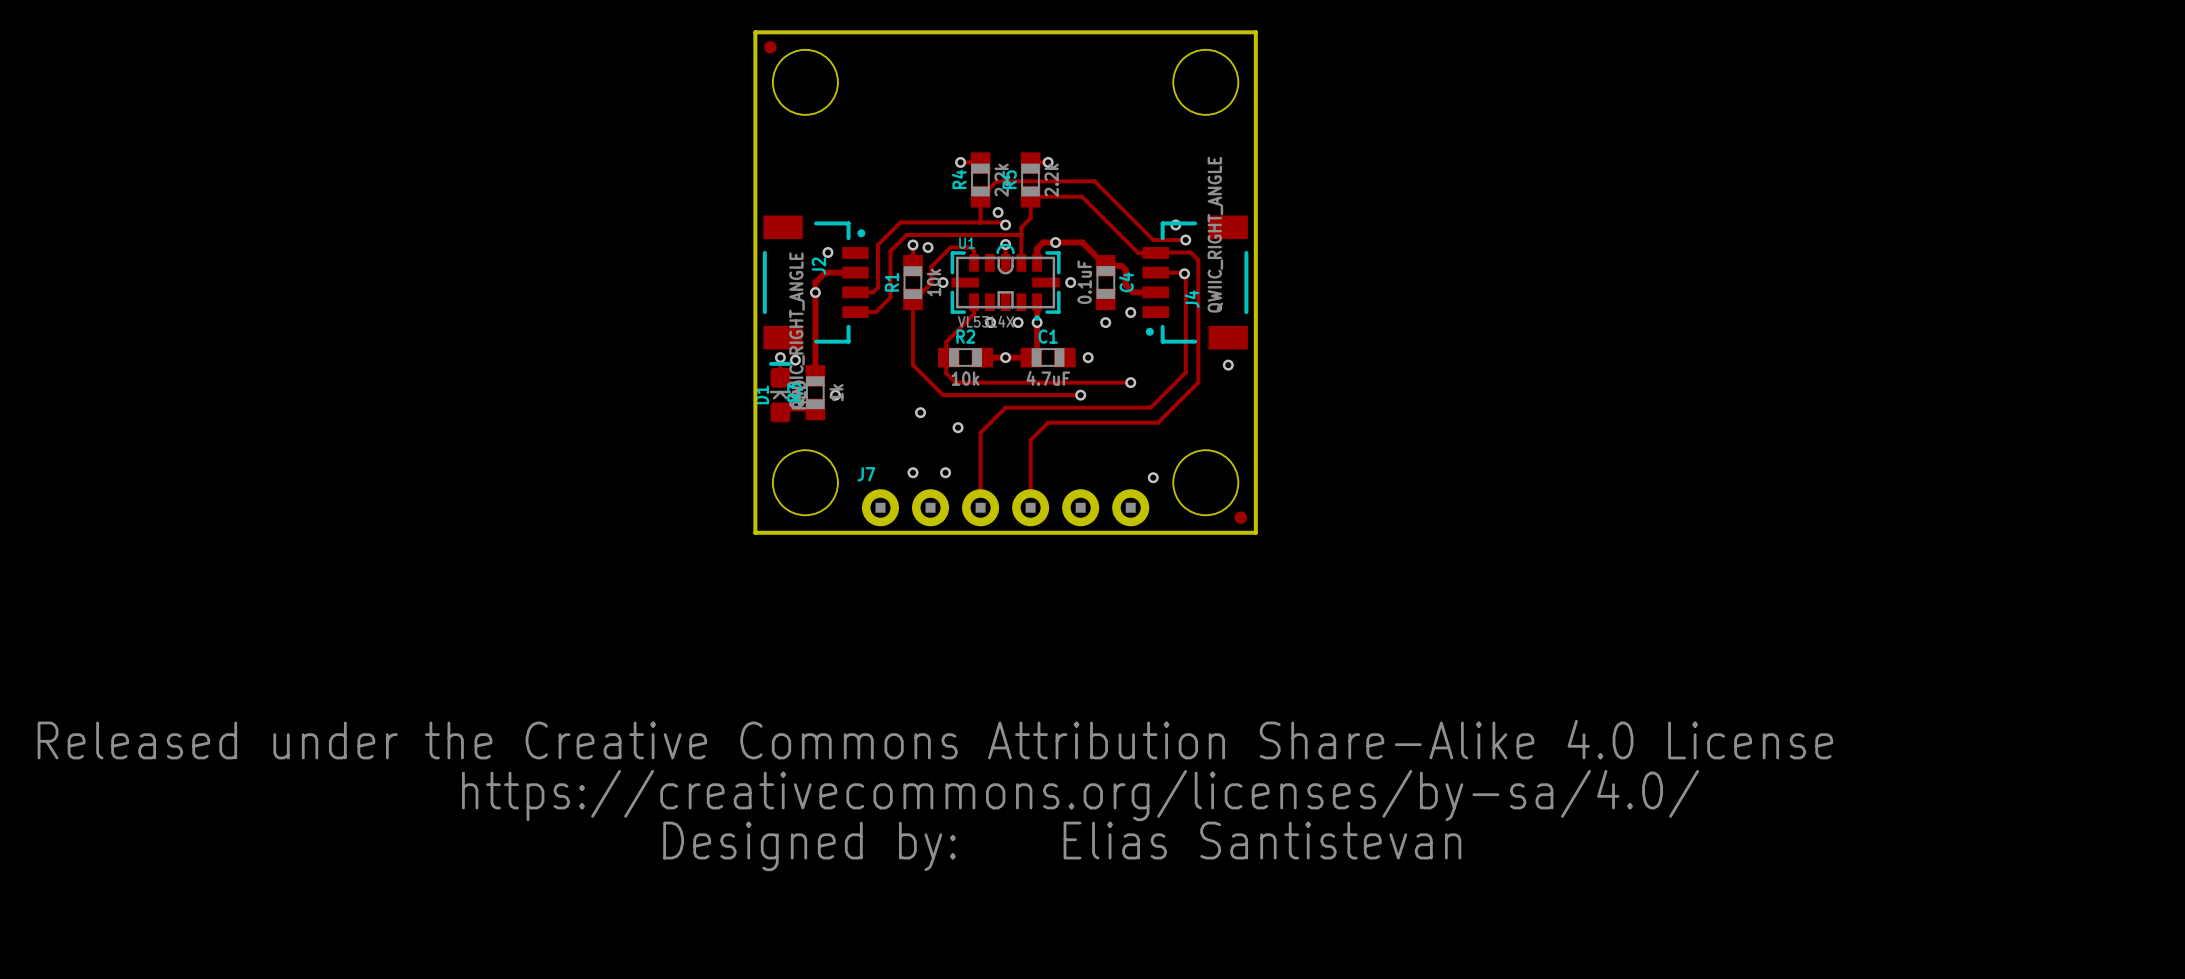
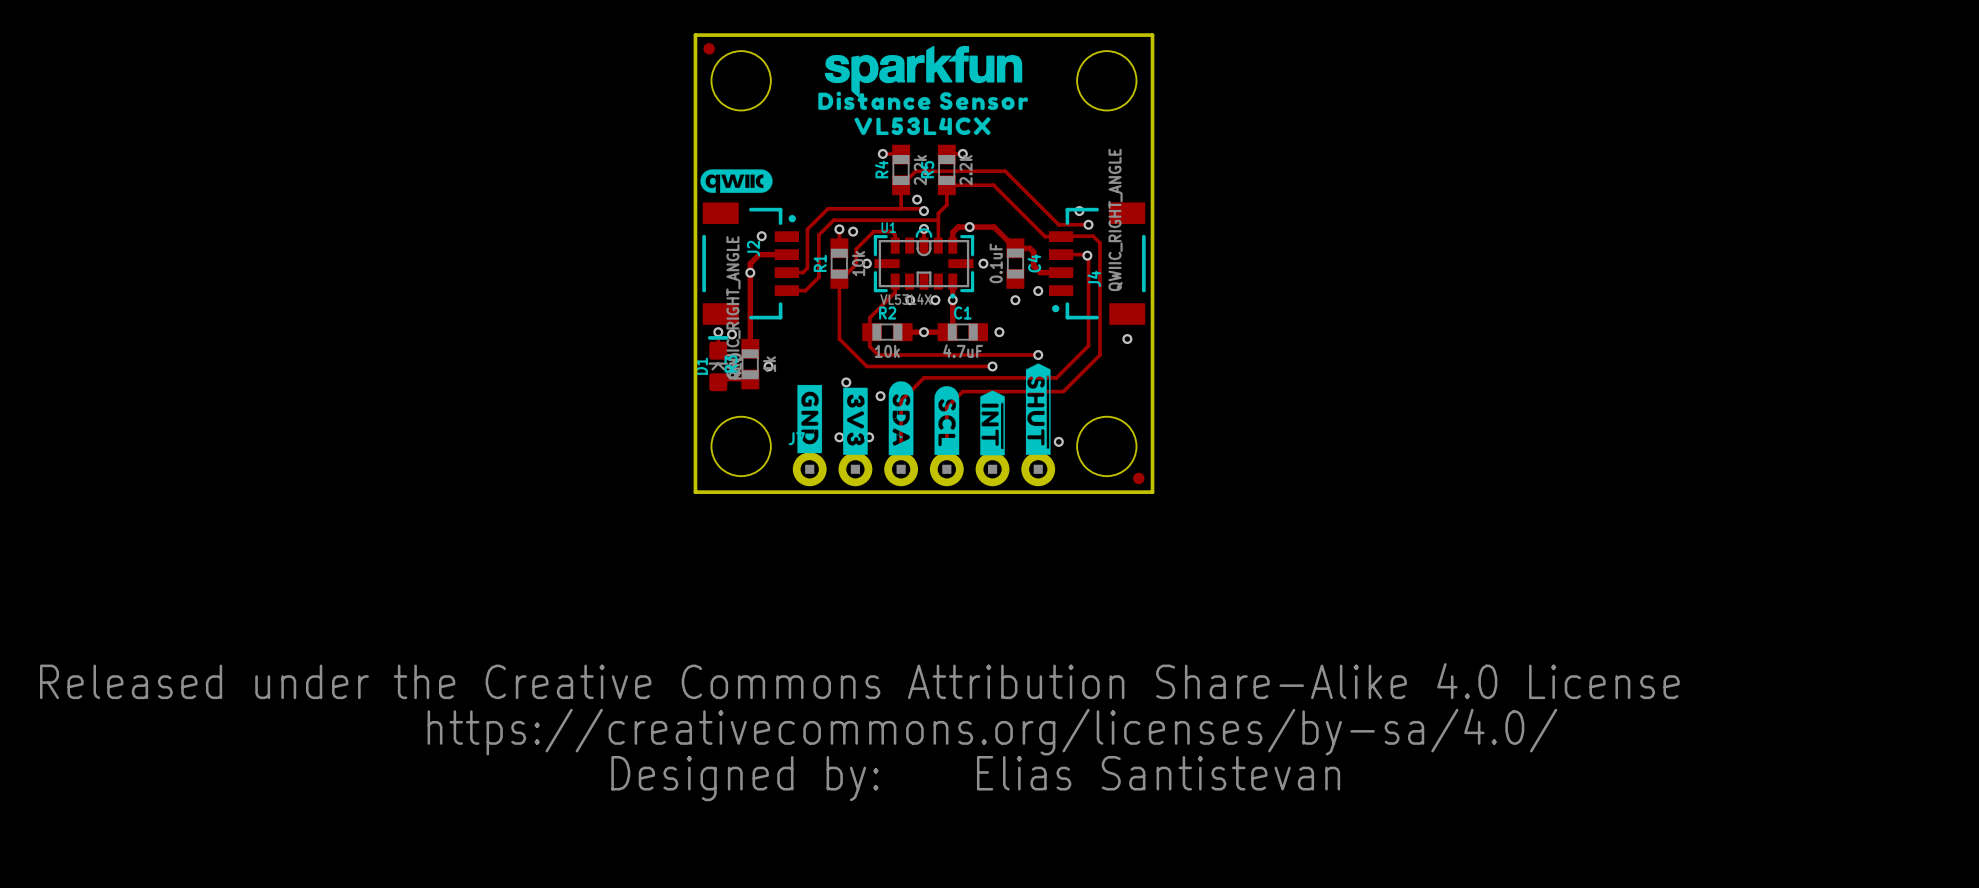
drawing: none -> [818, 45, 1029, 136]
drawing: none -> [700, 169, 773, 193]
drawing: none -> [797, 363, 1051, 456]

